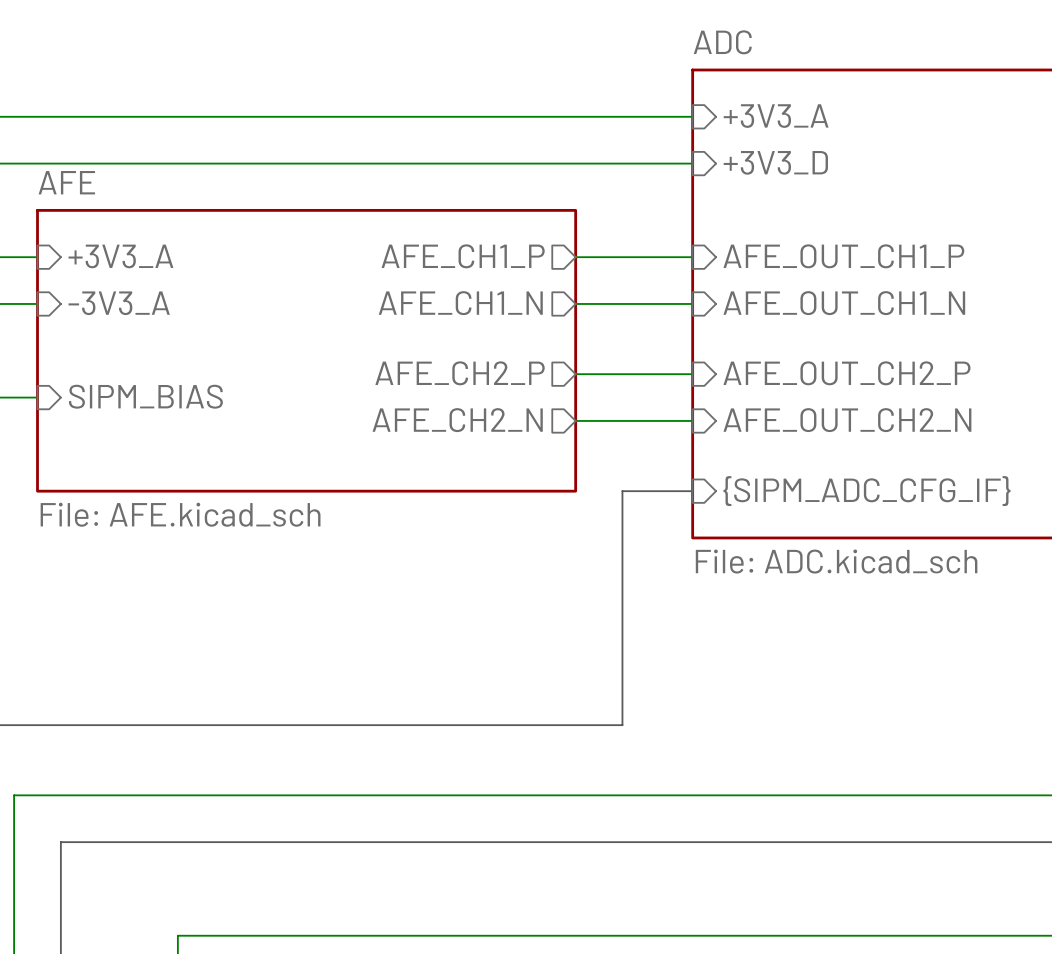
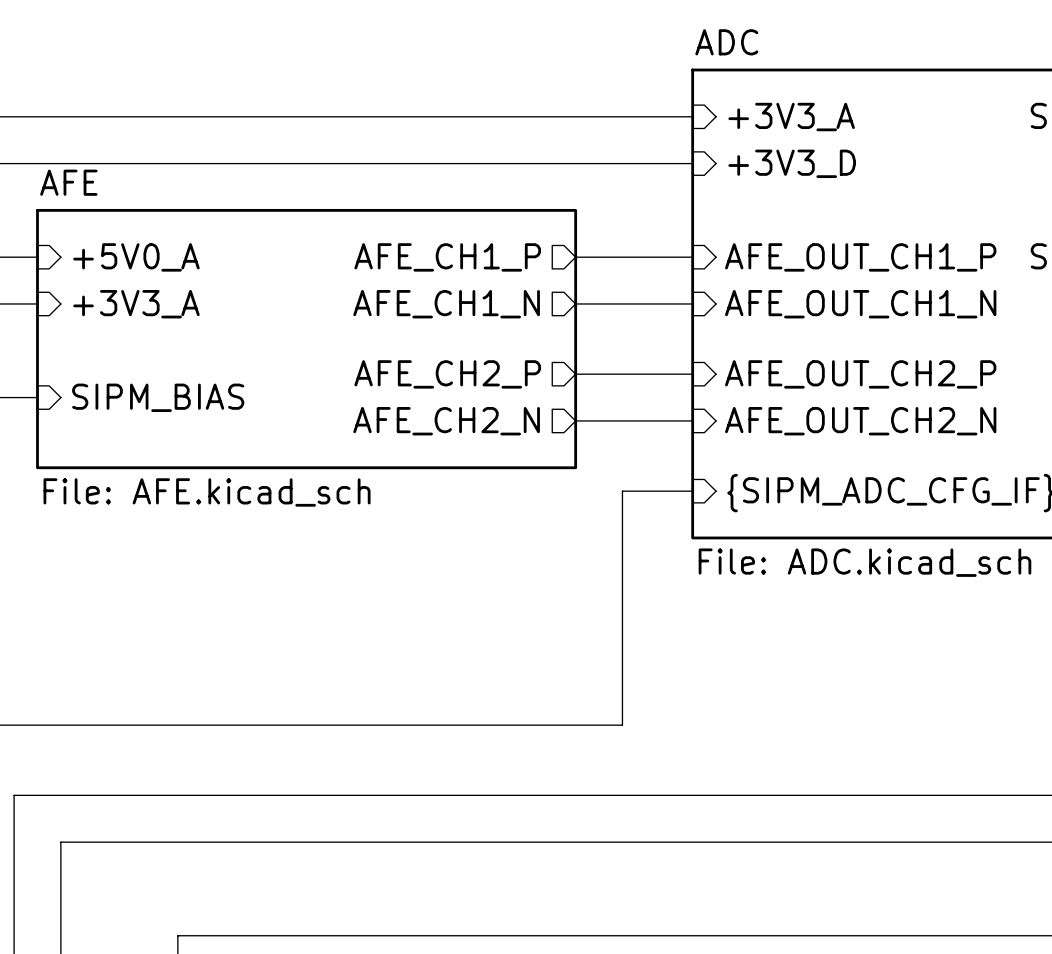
sheet AFE shape: [36, 208, 578, 493] -> [36, 208, 578, 470]
sheet pin: +3V3_A (120, 256) -> +5V0_A (136, 257)
sheet pin: -3V3_A (119, 303) -> +3V3_A (136, 304)

